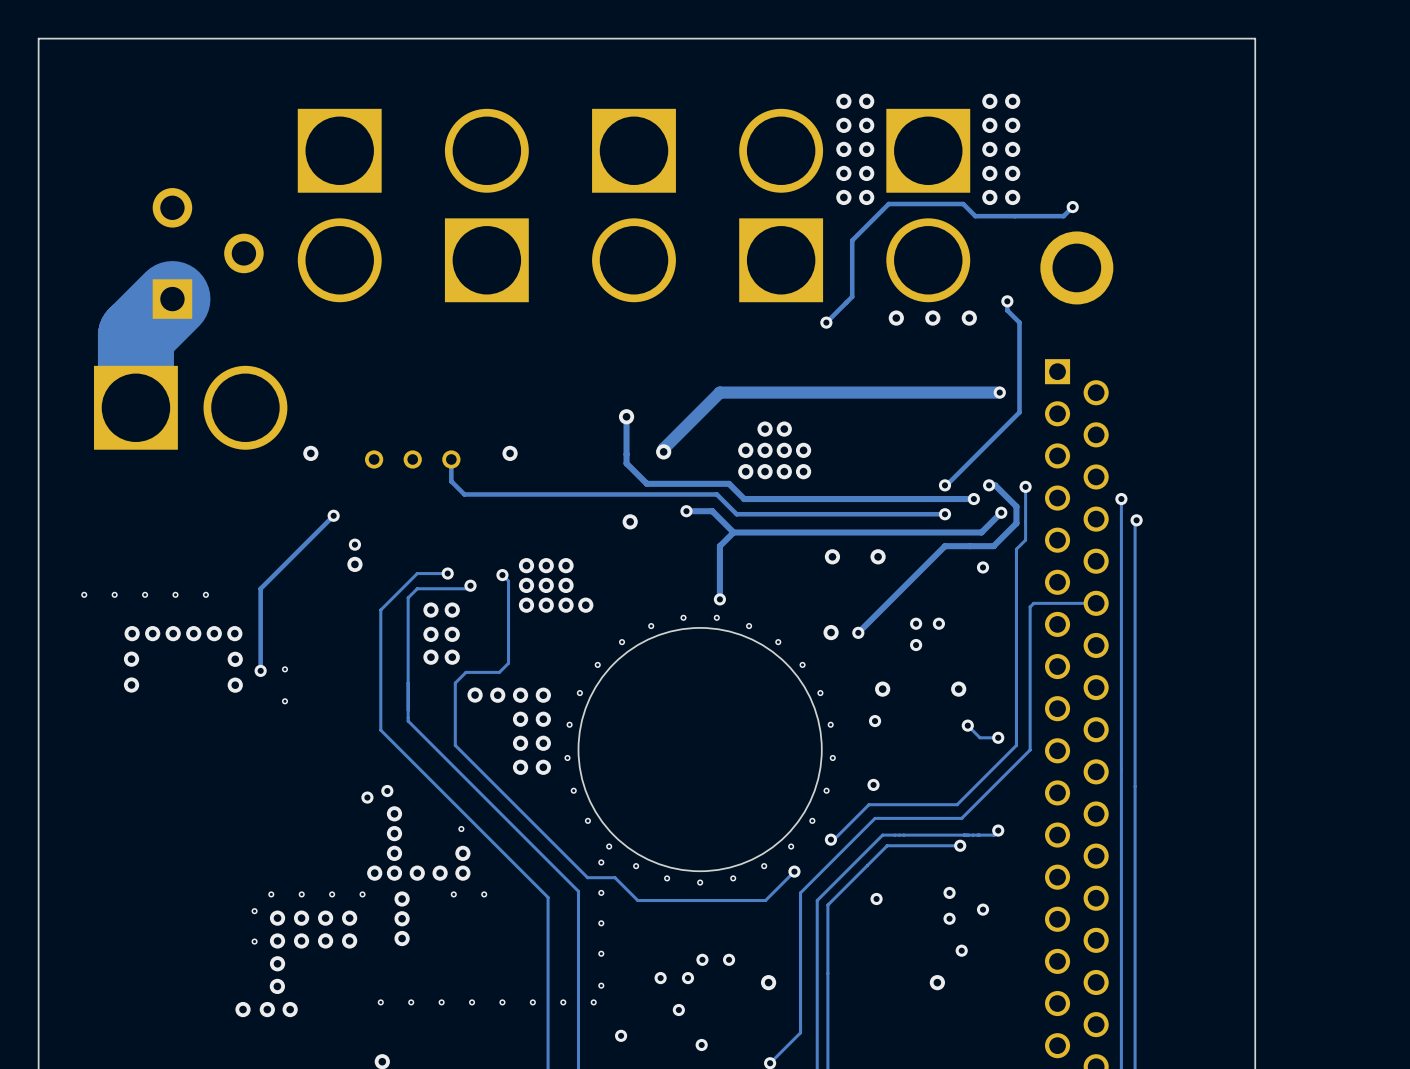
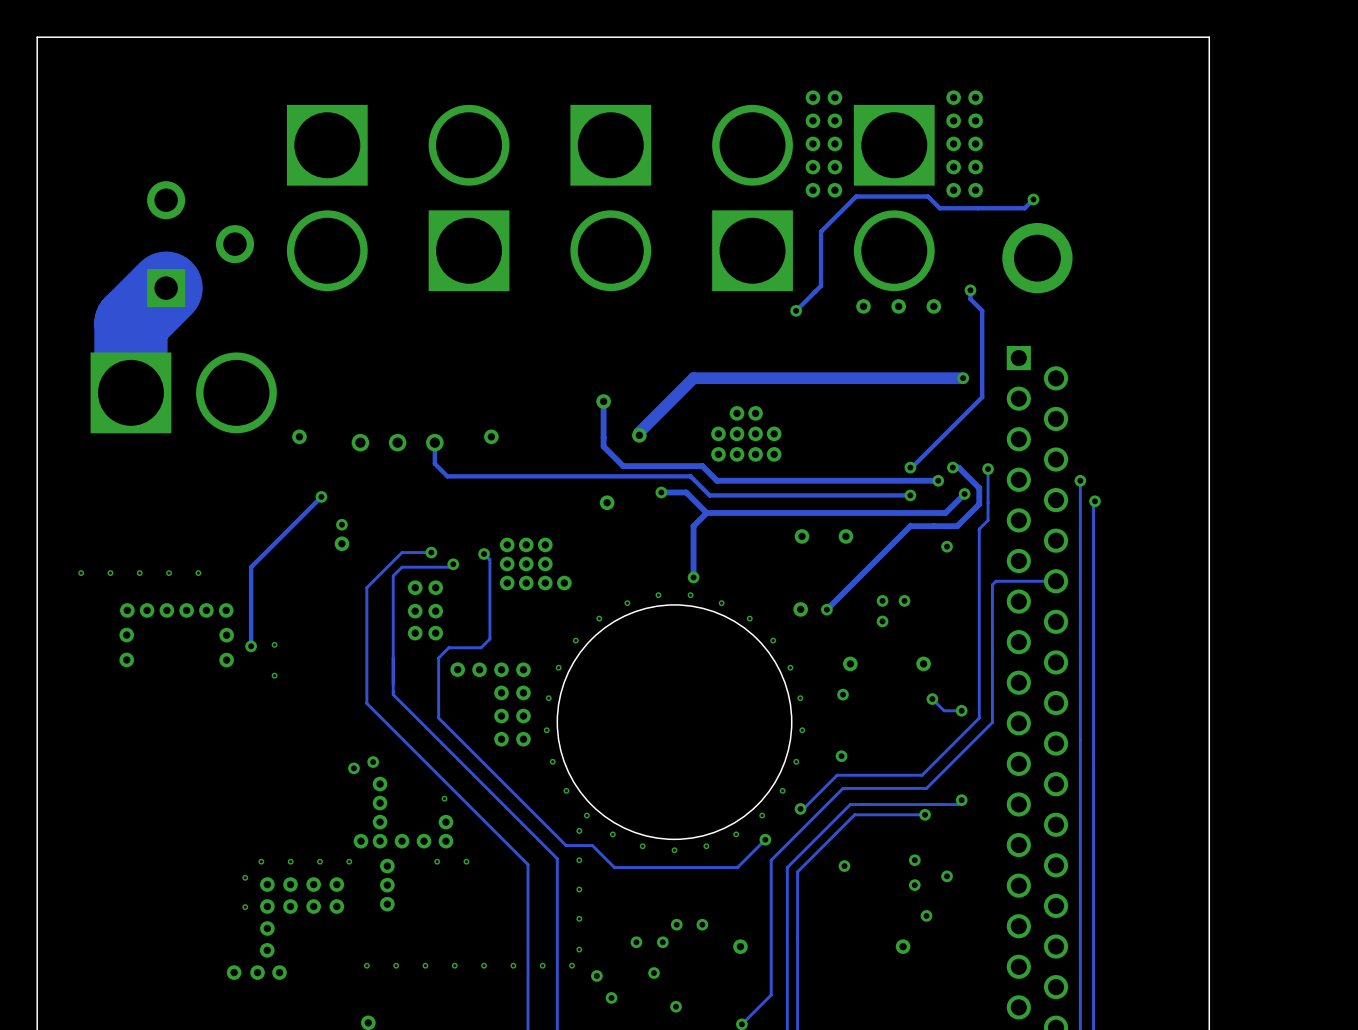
via: none -> (596, 975)
via: (621, 1035) -> none
via: none -> (611, 997)

